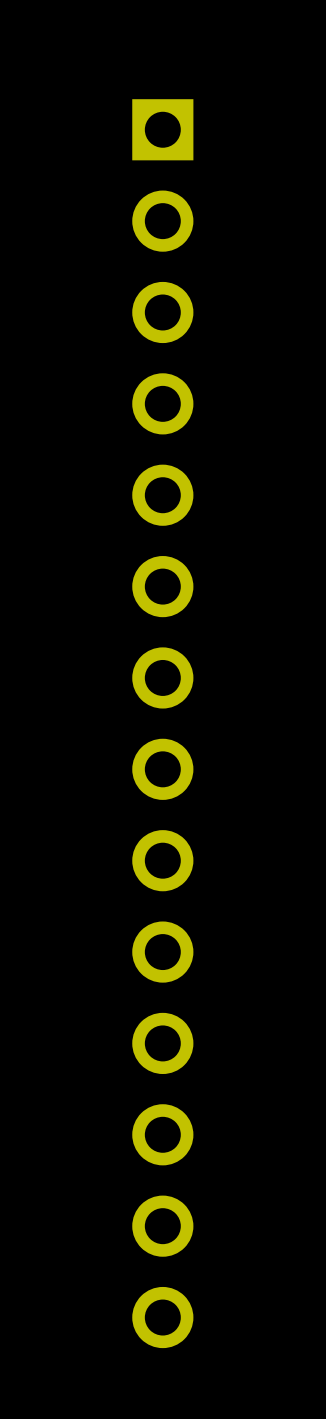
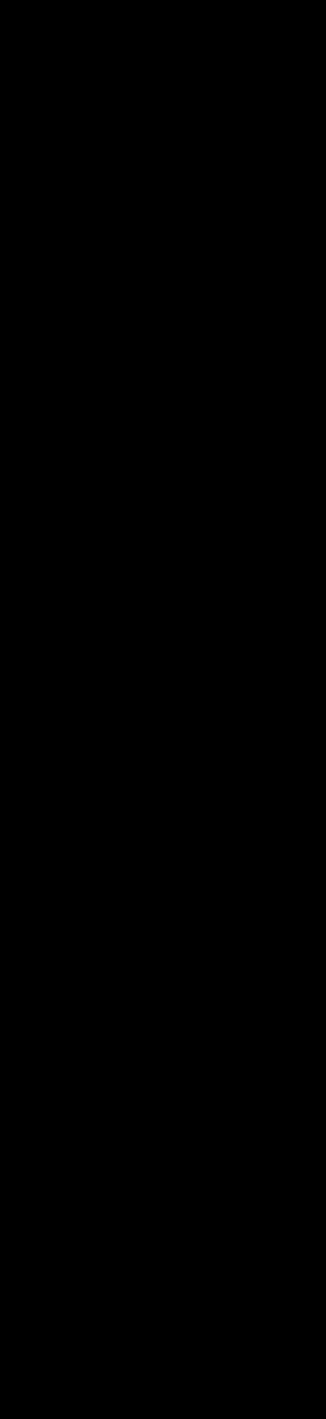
part: (162, 723) -> none

